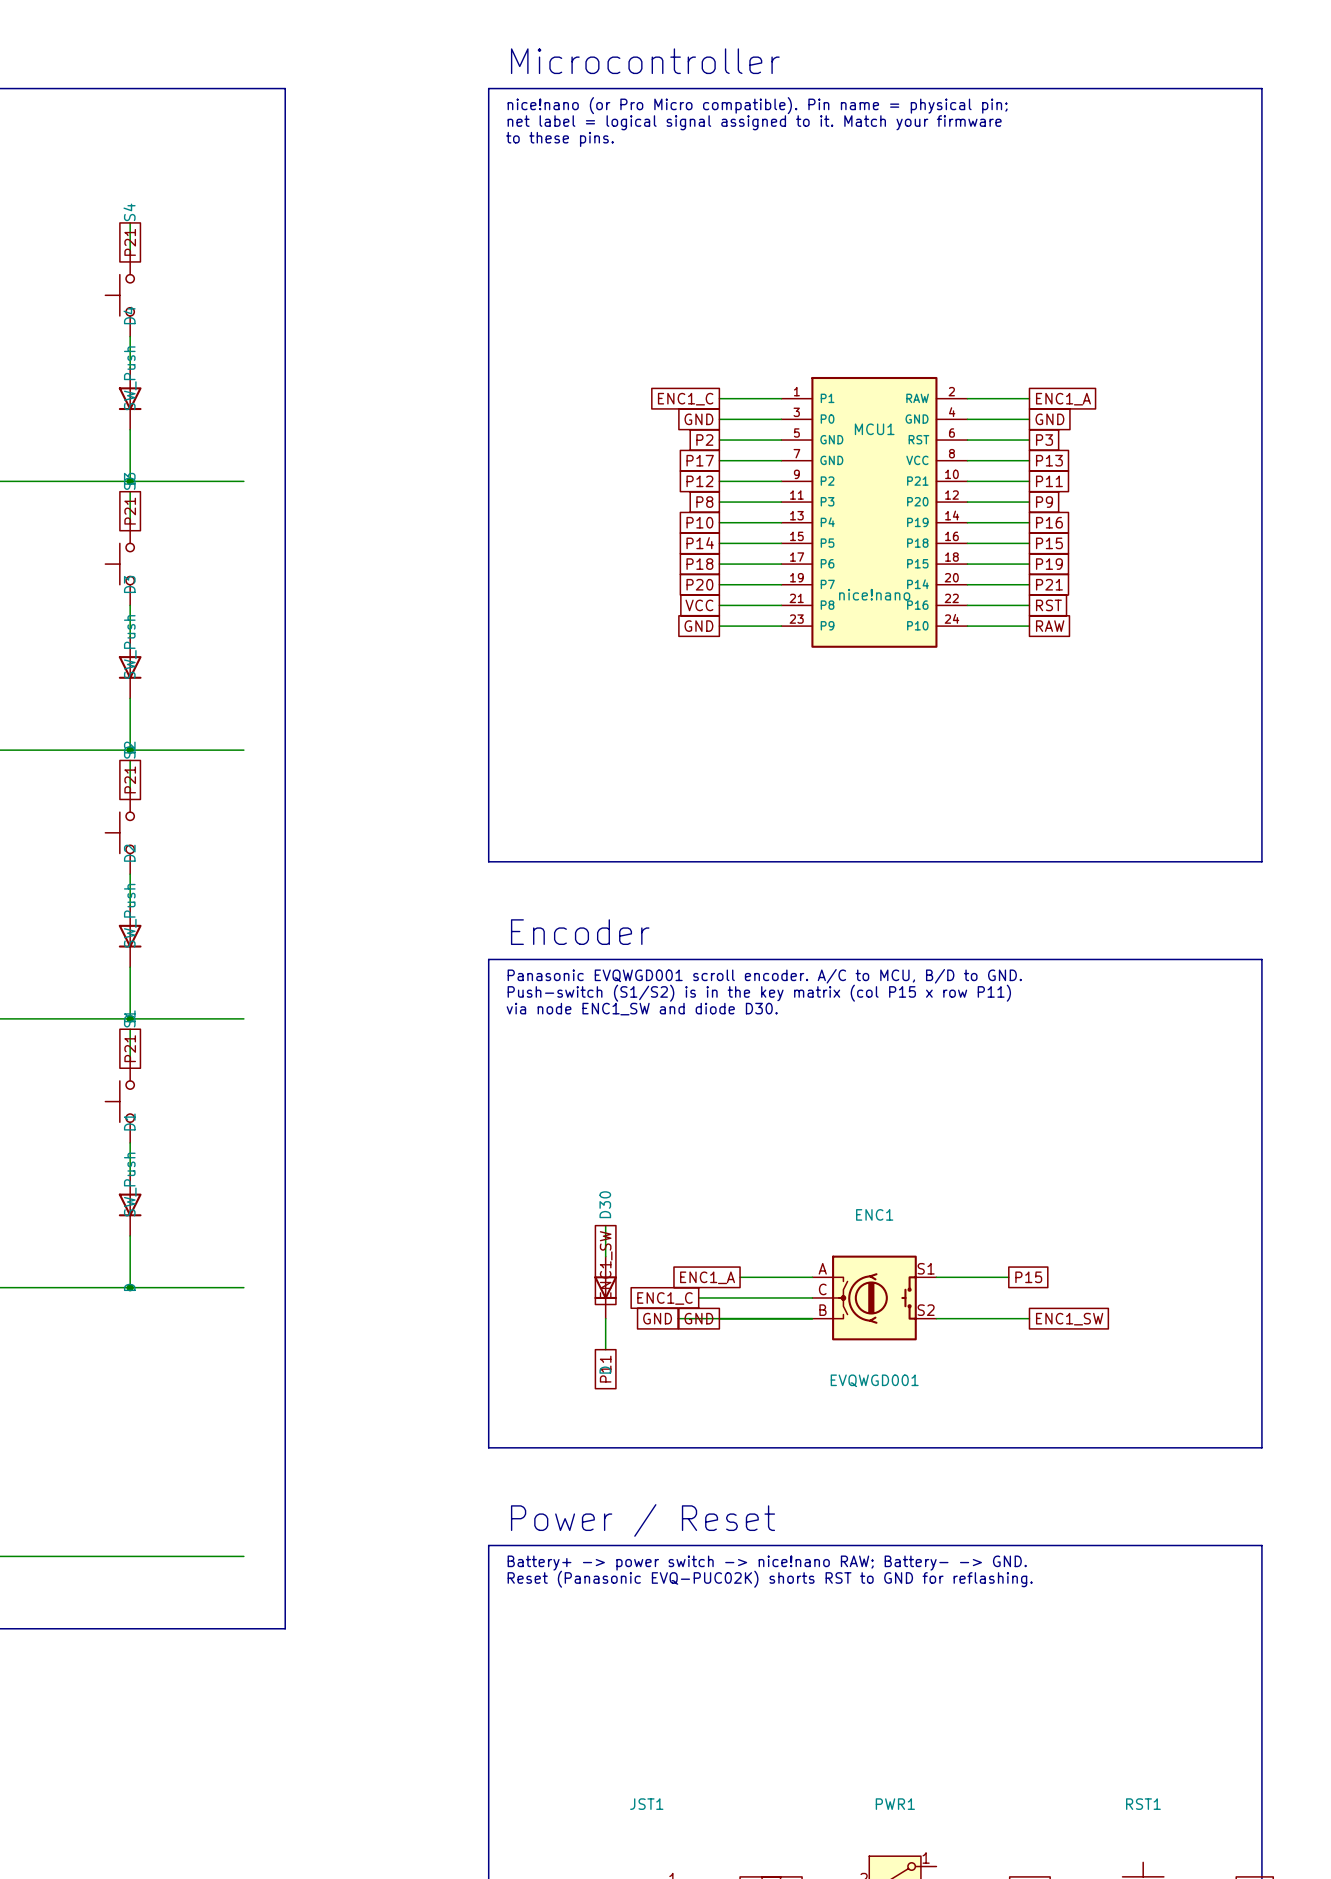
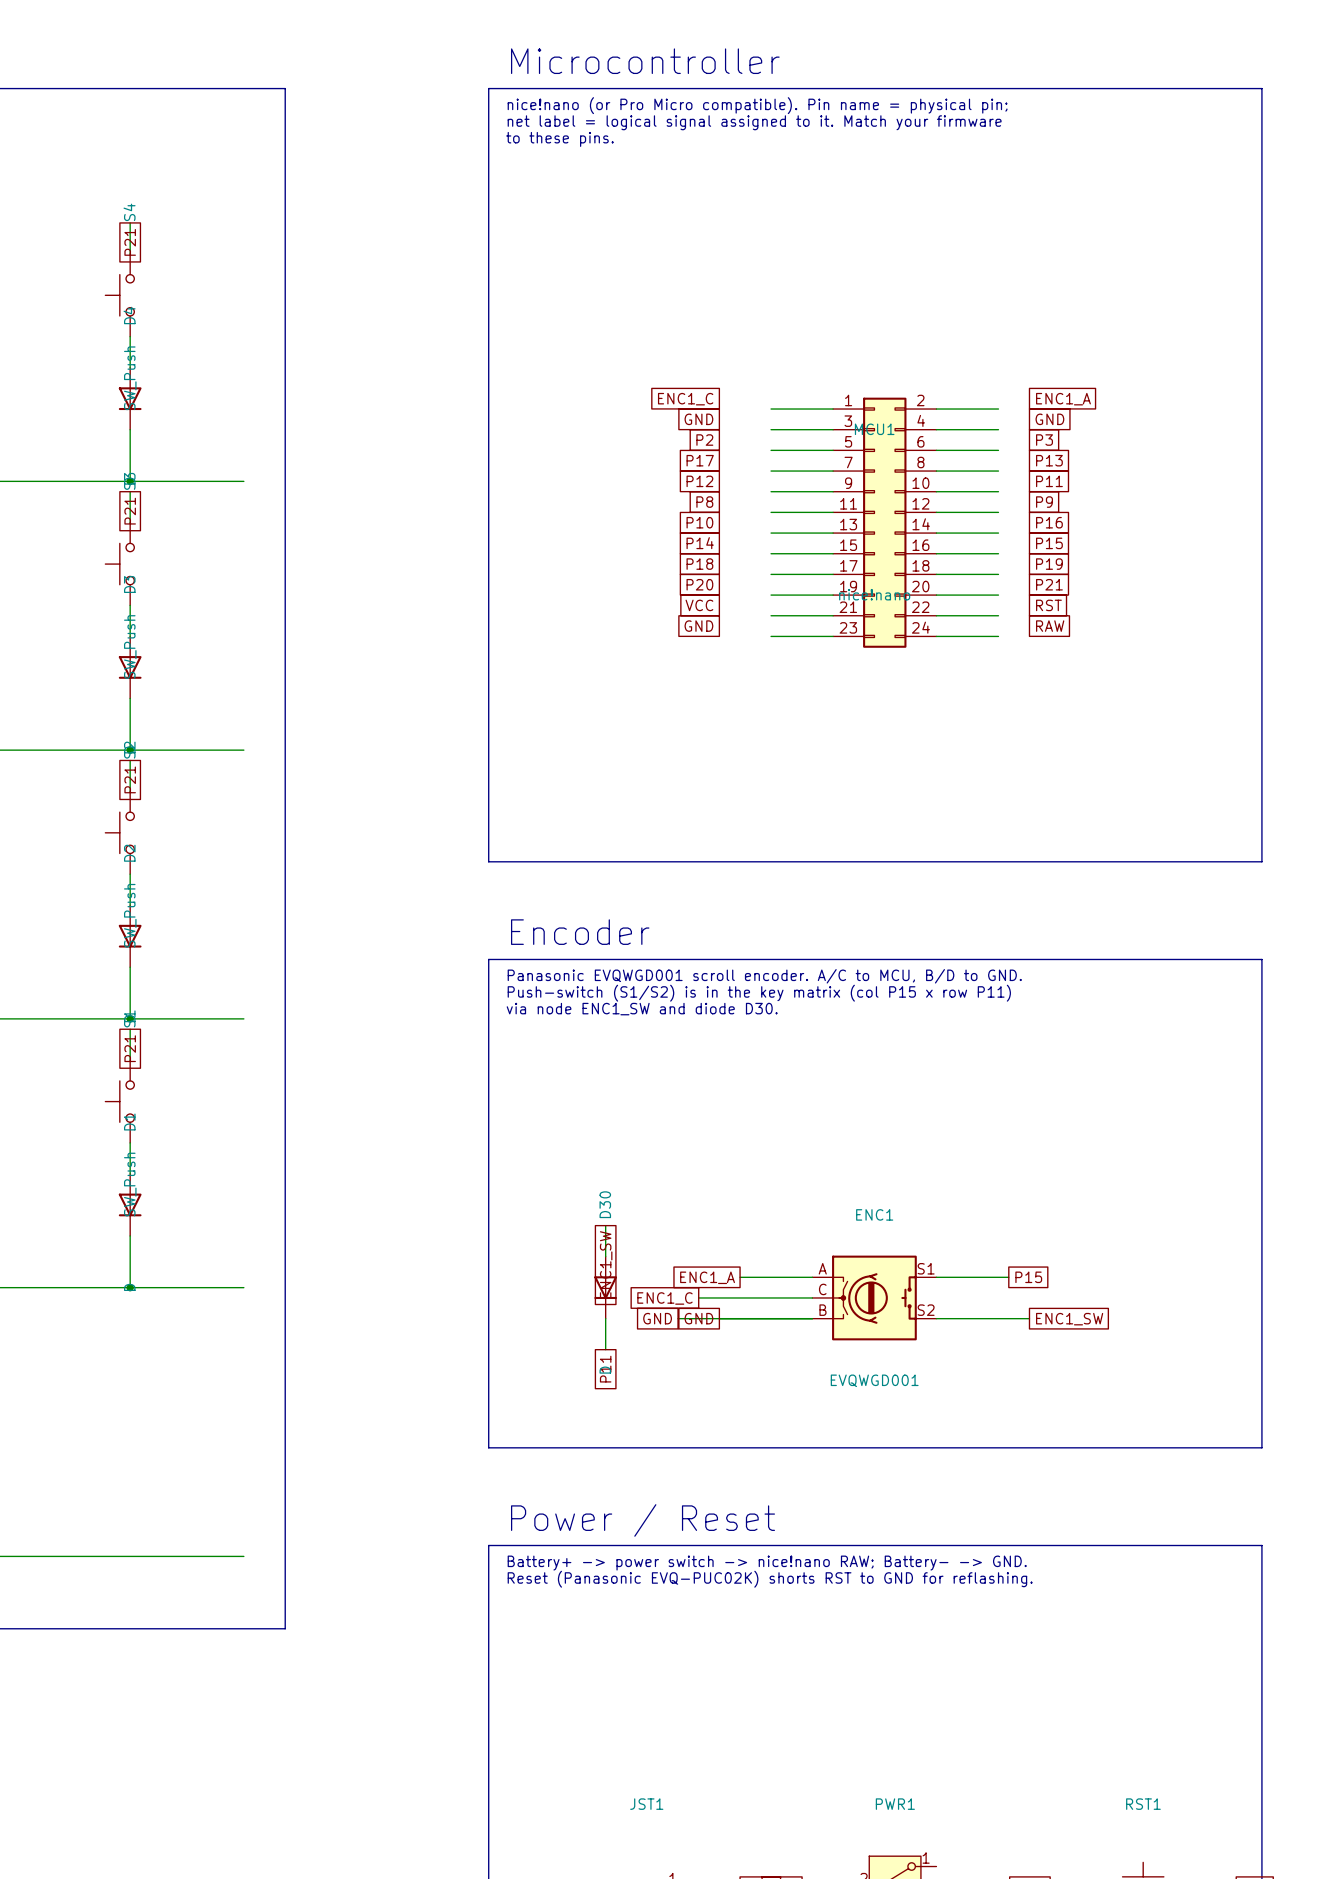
MCU1 symbol: [781, 376, 968, 648] -> [833, 397, 937, 648]
wire: (719, 398) (781, 398) -> (771, 409) (833, 409)
wire: (967, 398) (1029, 398) -> (936, 409) (998, 409)
wire: (719, 419) (781, 419) -> (771, 429) (833, 429)
wire: (967, 419) (1029, 419) -> (936, 429) (998, 429)
wire: (719, 440) (781, 440) -> (771, 450) (833, 450)
wire: (967, 440) (1029, 440) -> (936, 450) (998, 450)
wire: (719, 460) (781, 460) -> (771, 471) (833, 471)
wire: (967, 460) (1029, 460) -> (936, 471) (998, 471)
wire: (719, 481) (781, 481) -> (771, 491) (833, 491)
wire: (967, 481) (1029, 481) -> (936, 491) (998, 491)
wire: (719, 502) (781, 502) -> (771, 512) (833, 512)
wire: (967, 502) (1029, 502) -> (936, 512) (998, 512)
wire: (719, 522) (781, 522) -> (771, 533) (833, 533)
wire: (967, 522) (1029, 522) -> (936, 533) (998, 533)
wire: (719, 543) (781, 543) -> (771, 553) (833, 553)
wire: (967, 543) (1029, 543) -> (936, 553) (998, 553)
wire: (719, 564) (781, 564) -> (771, 574) (833, 574)
wire: (967, 564) (1029, 564) -> (936, 574) (998, 574)
wire: (719, 584) (781, 584) -> (771, 595) (833, 595)
wire: (967, 584) (1029, 584) -> (936, 595) (998, 595)
wire: (719, 605) (781, 605) -> (771, 615) (833, 615)
wire: (967, 605) (1029, 605) -> (936, 615) (998, 615)
wire: (719, 626) (781, 626) -> (771, 636) (833, 636)
wire: (967, 626) (1029, 626) -> (936, 636) (998, 636)

